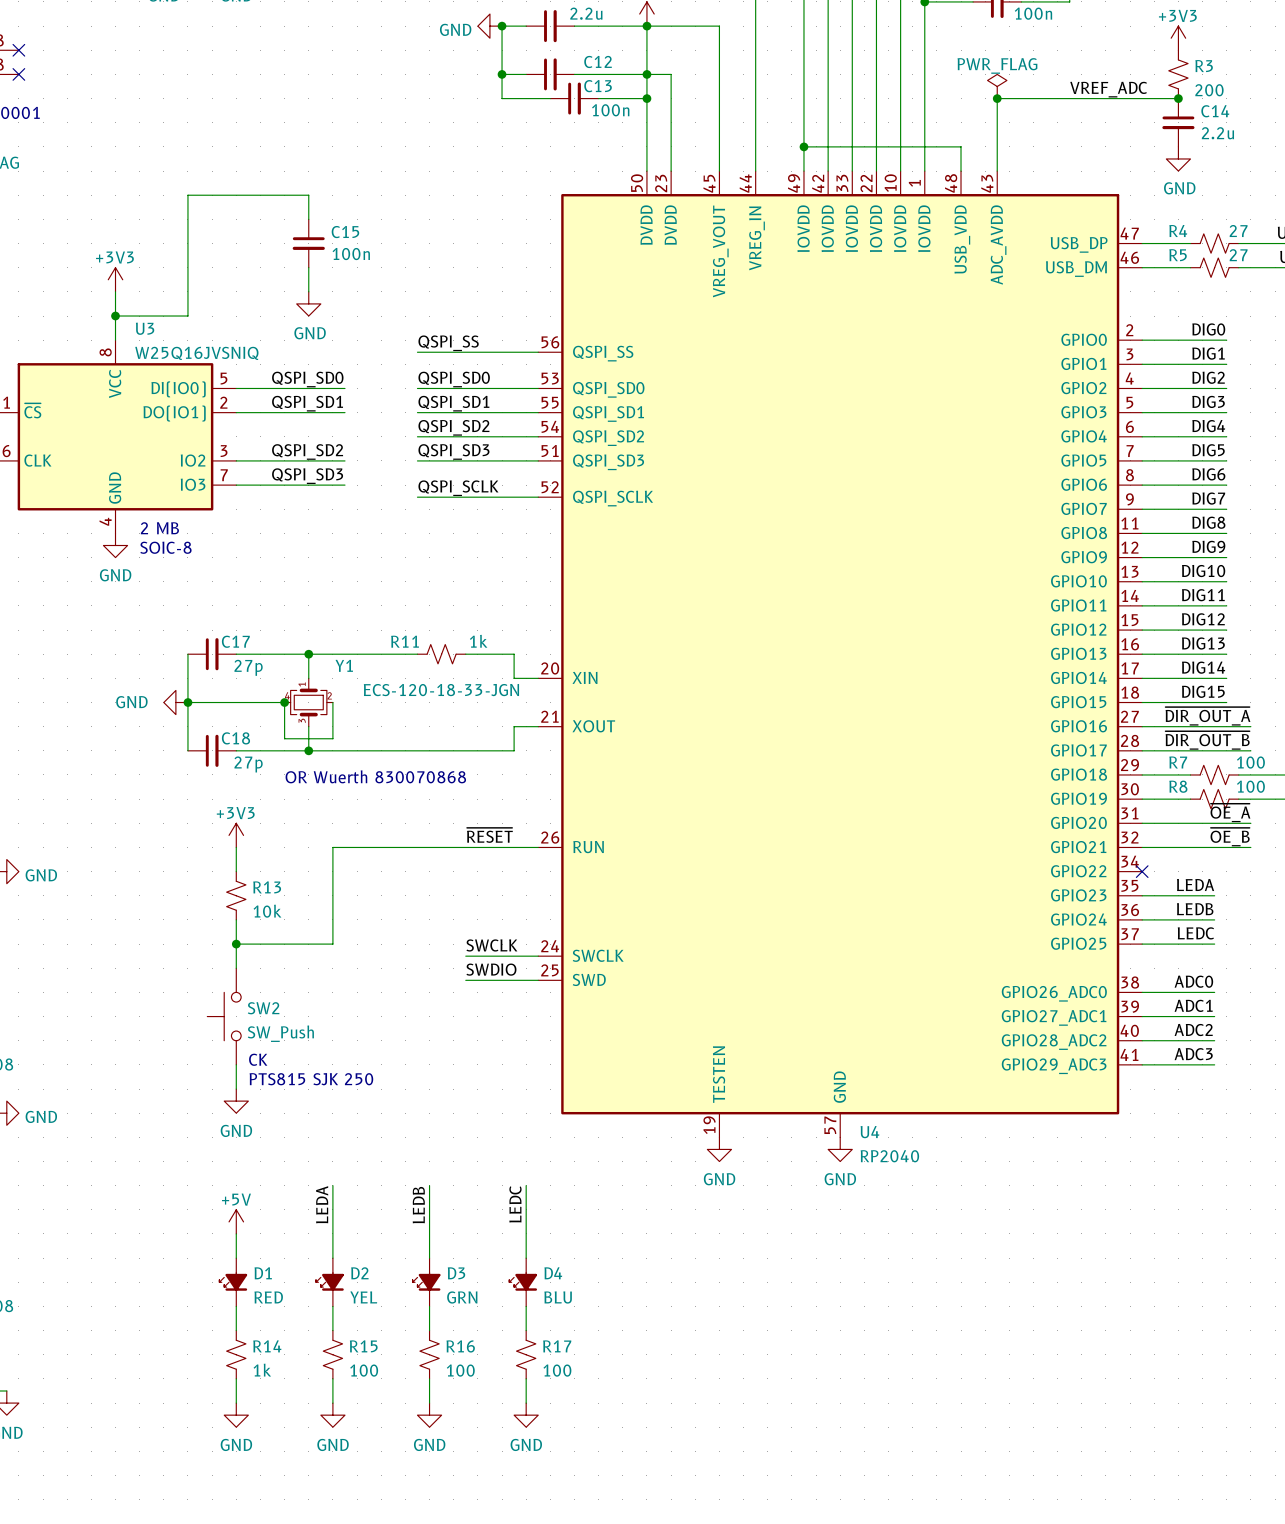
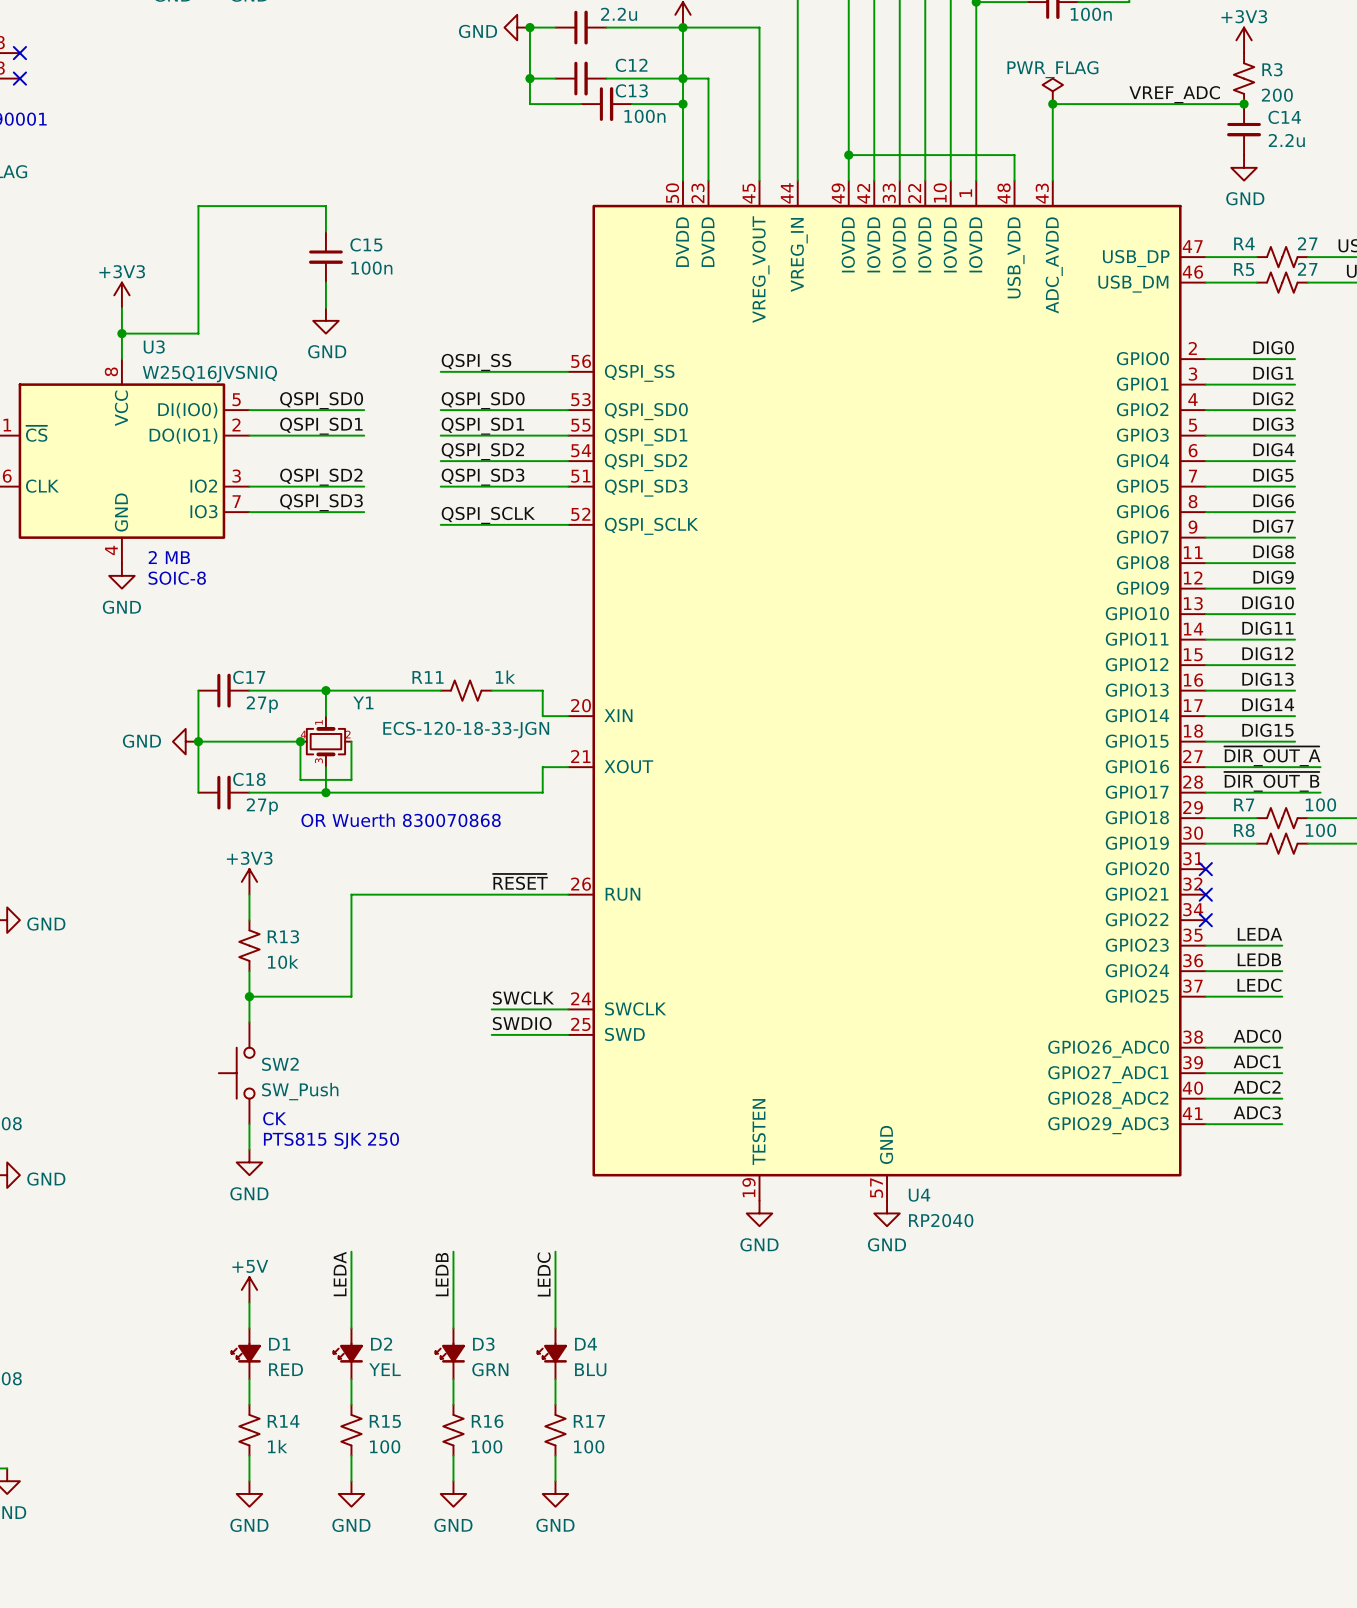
label: ~{OE_A} (1230, 812) -> none
wire: (1142, 823) (1250, 823) -> none
no-connect mark: none -> (1205, 869)
label: ~{OE_B} (1230, 837) -> none
wire: (1142, 847) (1250, 847) -> none
no-connect mark: none -> (1205, 894)

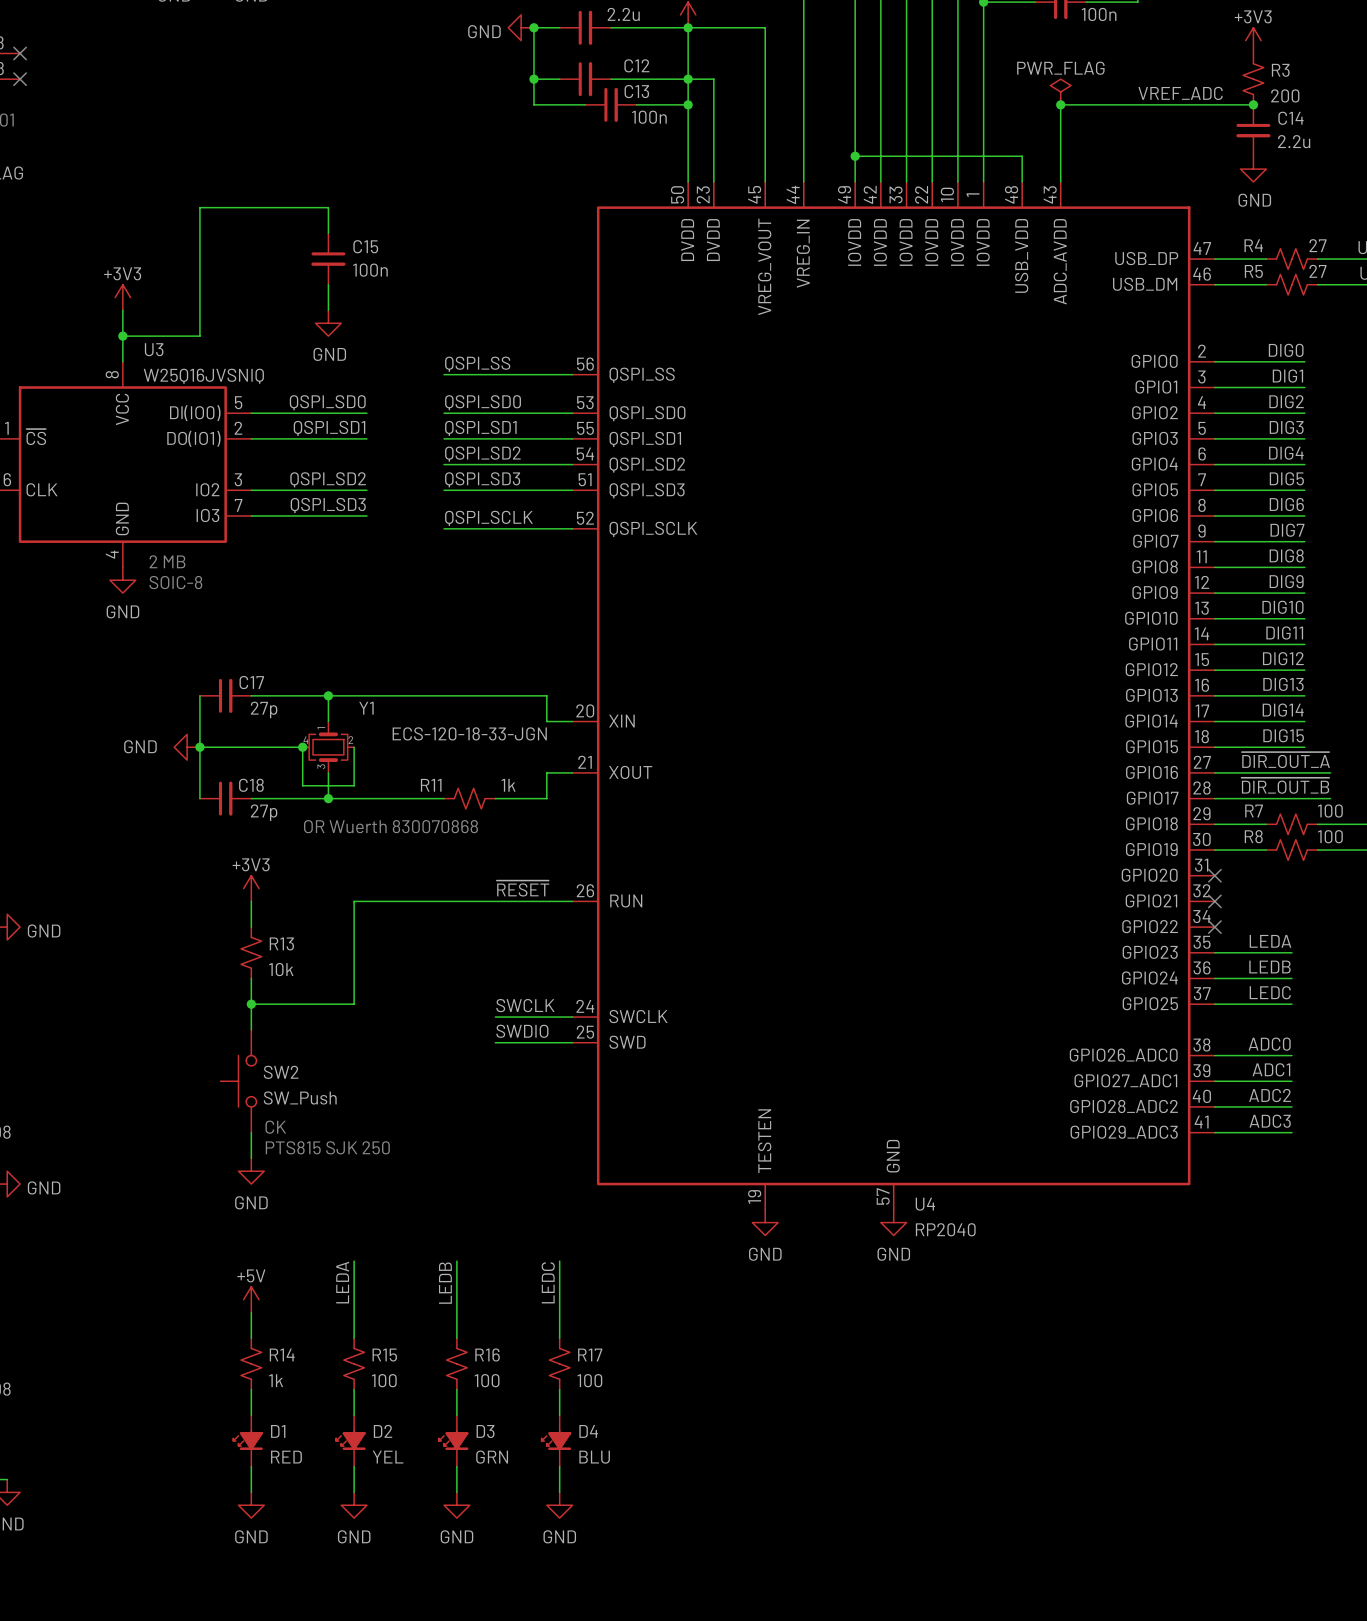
R11 position: (466, 690) -> (469, 798)
D1 position: (246, 1353) -> (248, 1441)
D2 position: (348, 1353) -> (350, 1441)
D3 position: (450, 1353) -> (453, 1441)
D4 position: (552, 1353) -> (556, 1441)
R14 position: (249, 1430) -> (251, 1363)
R15 position: (351, 1430) -> (354, 1363)
R16 position: (453, 1430) -> (456, 1363)
R17 position: (555, 1430) -> (559, 1363)

